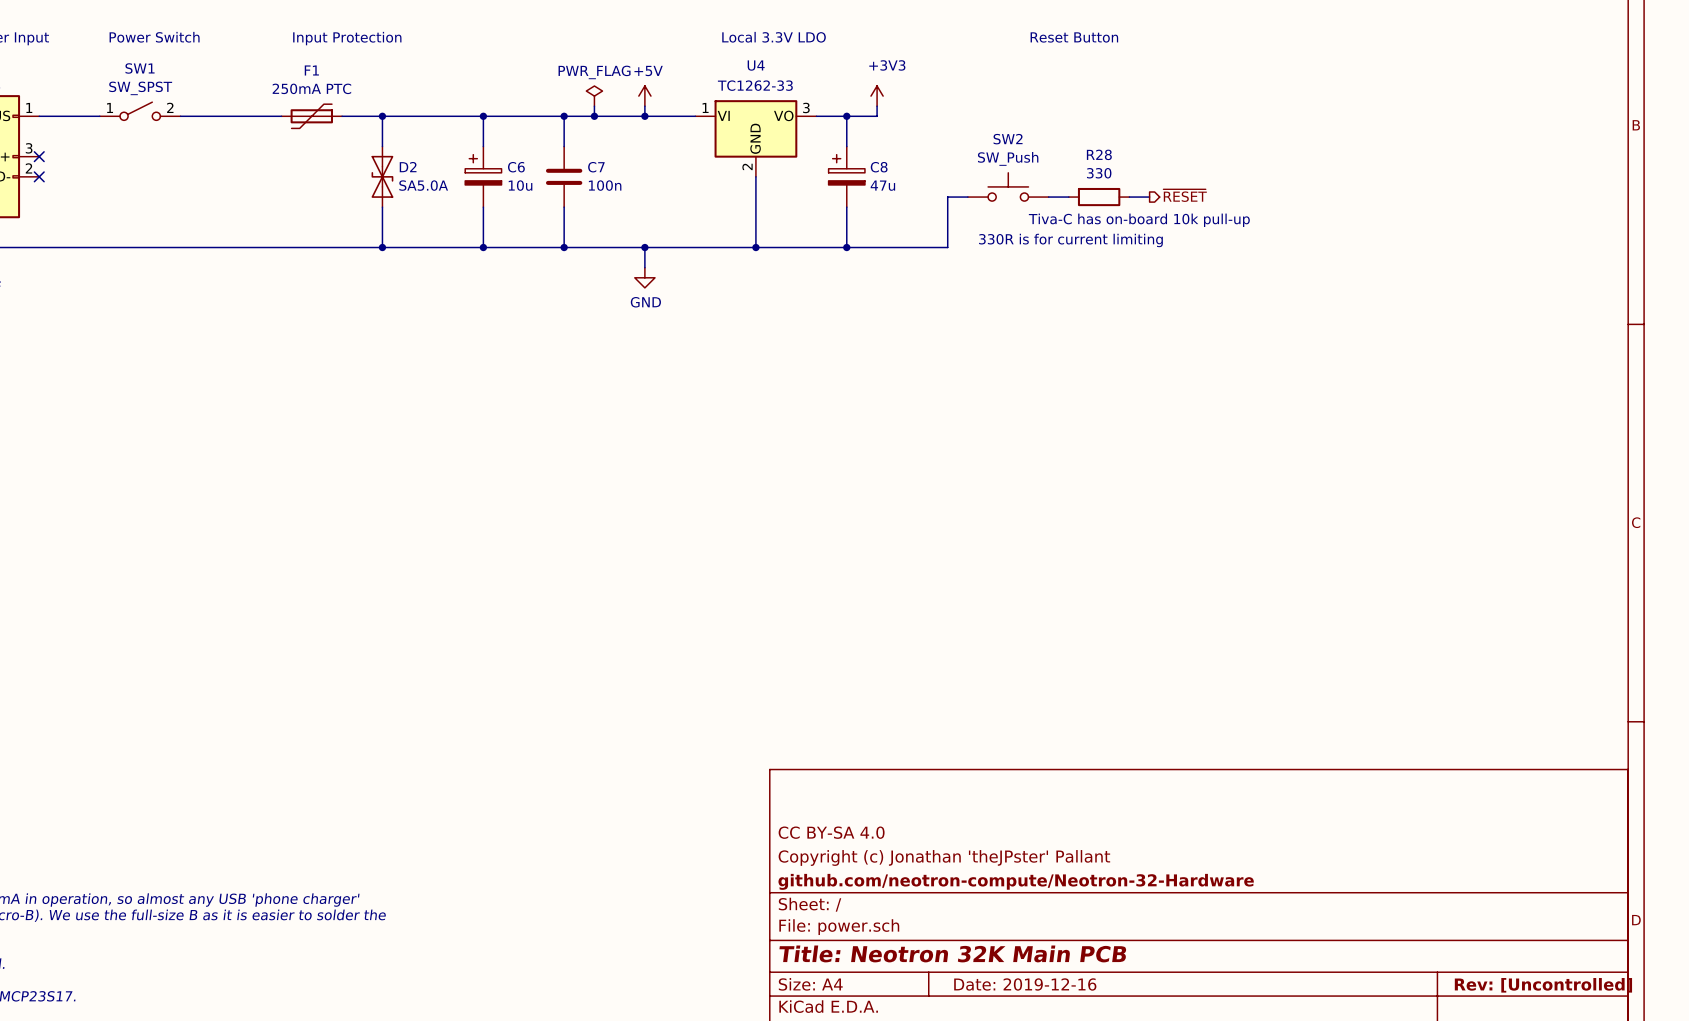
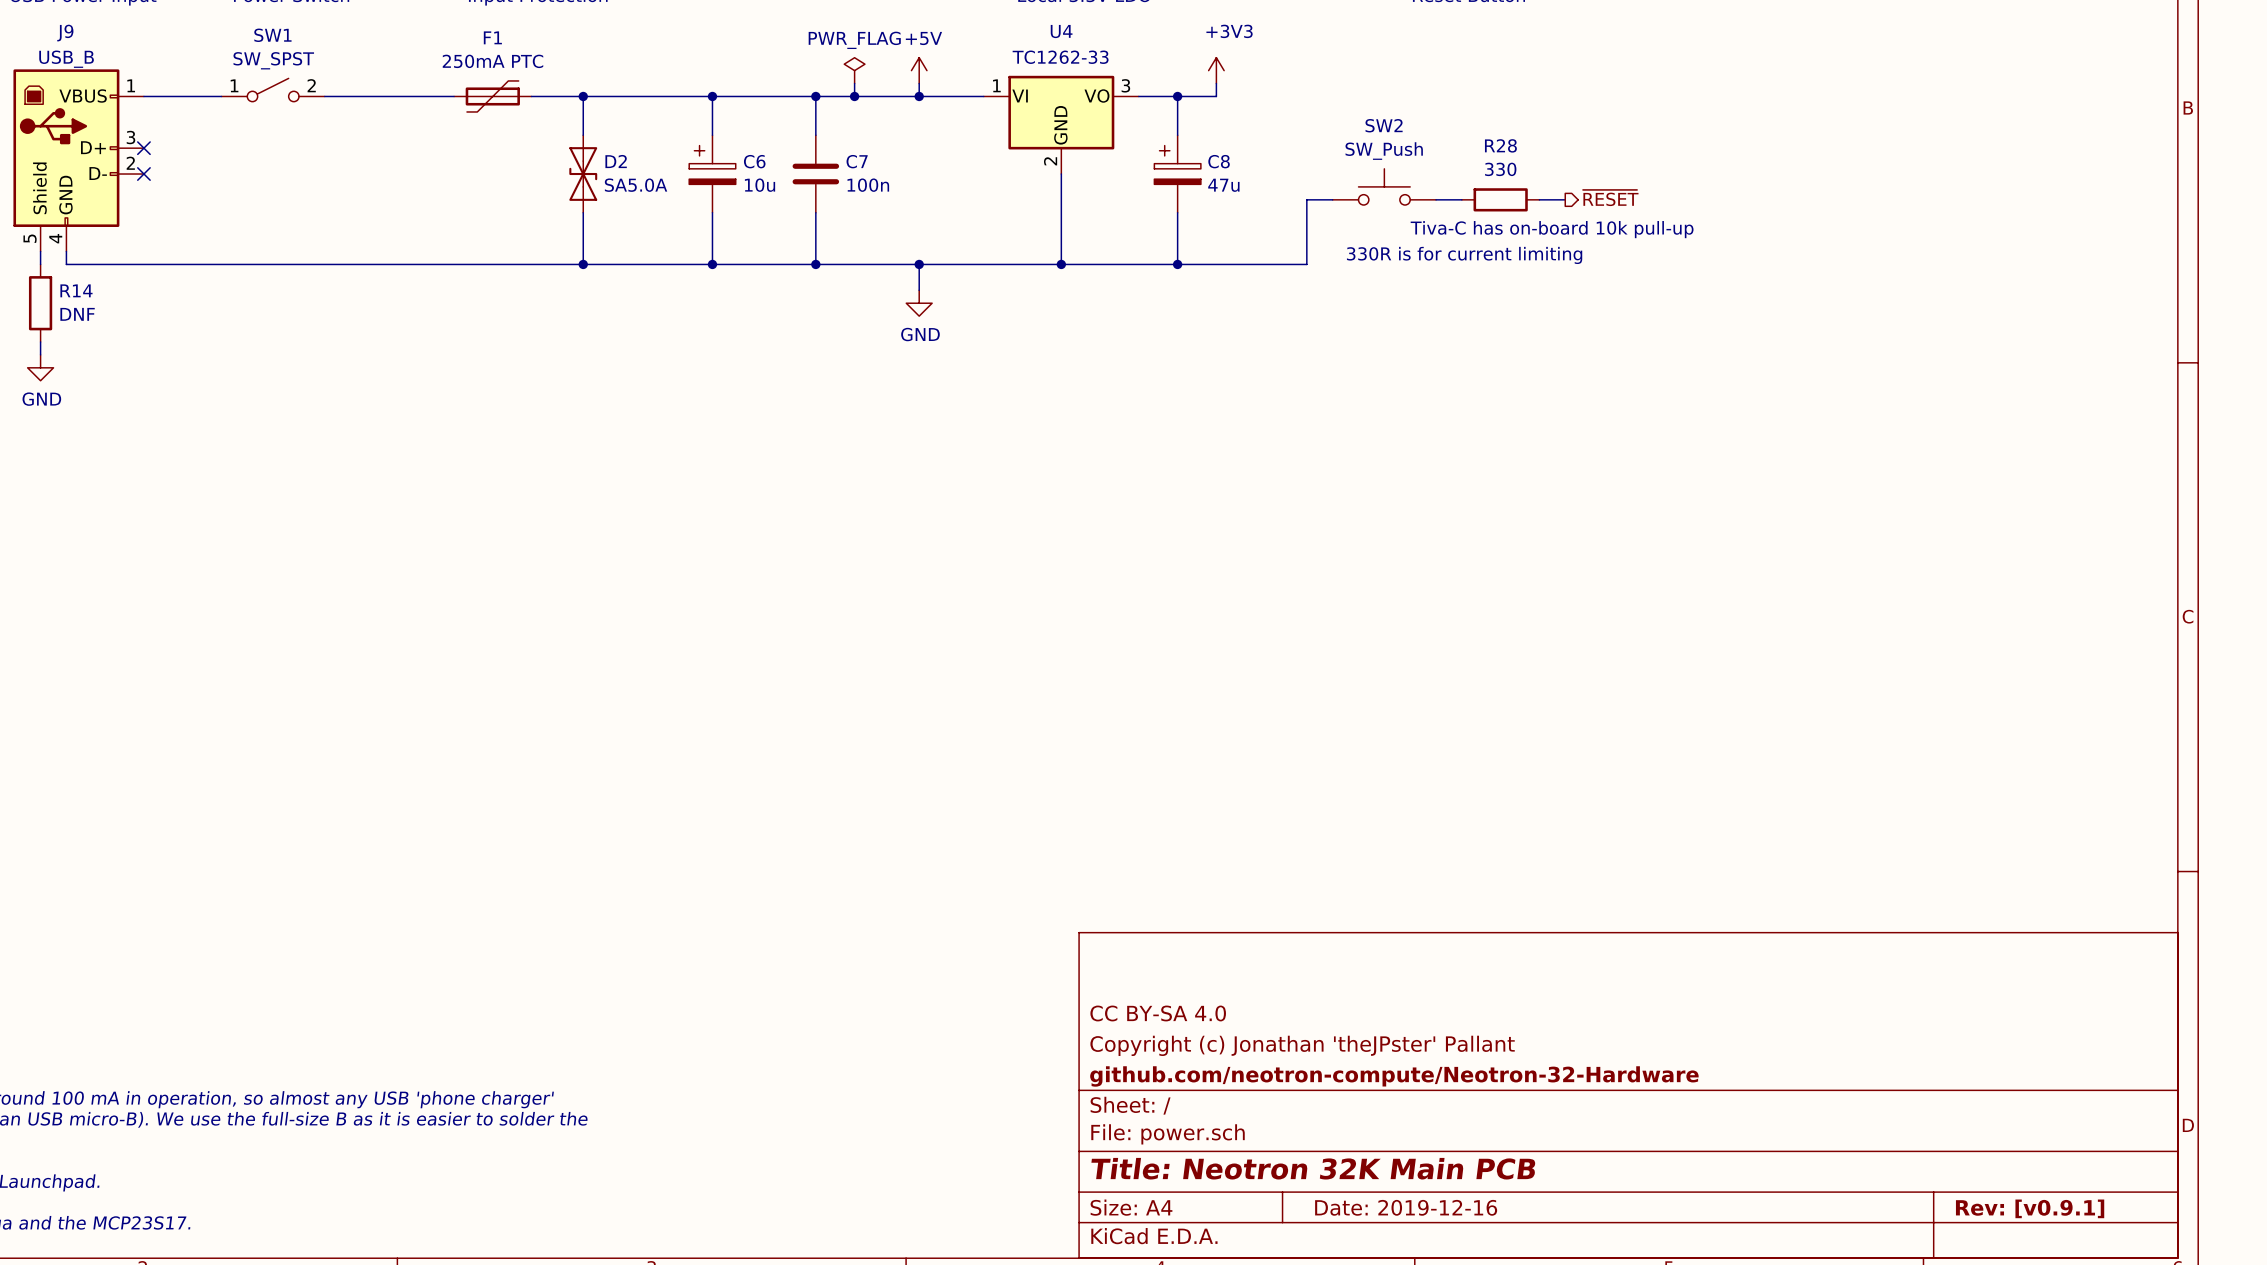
title block: Rev: [Uncontrolled] (1543, 985) -> Rev: [v0.9.1] (2030, 1208)

